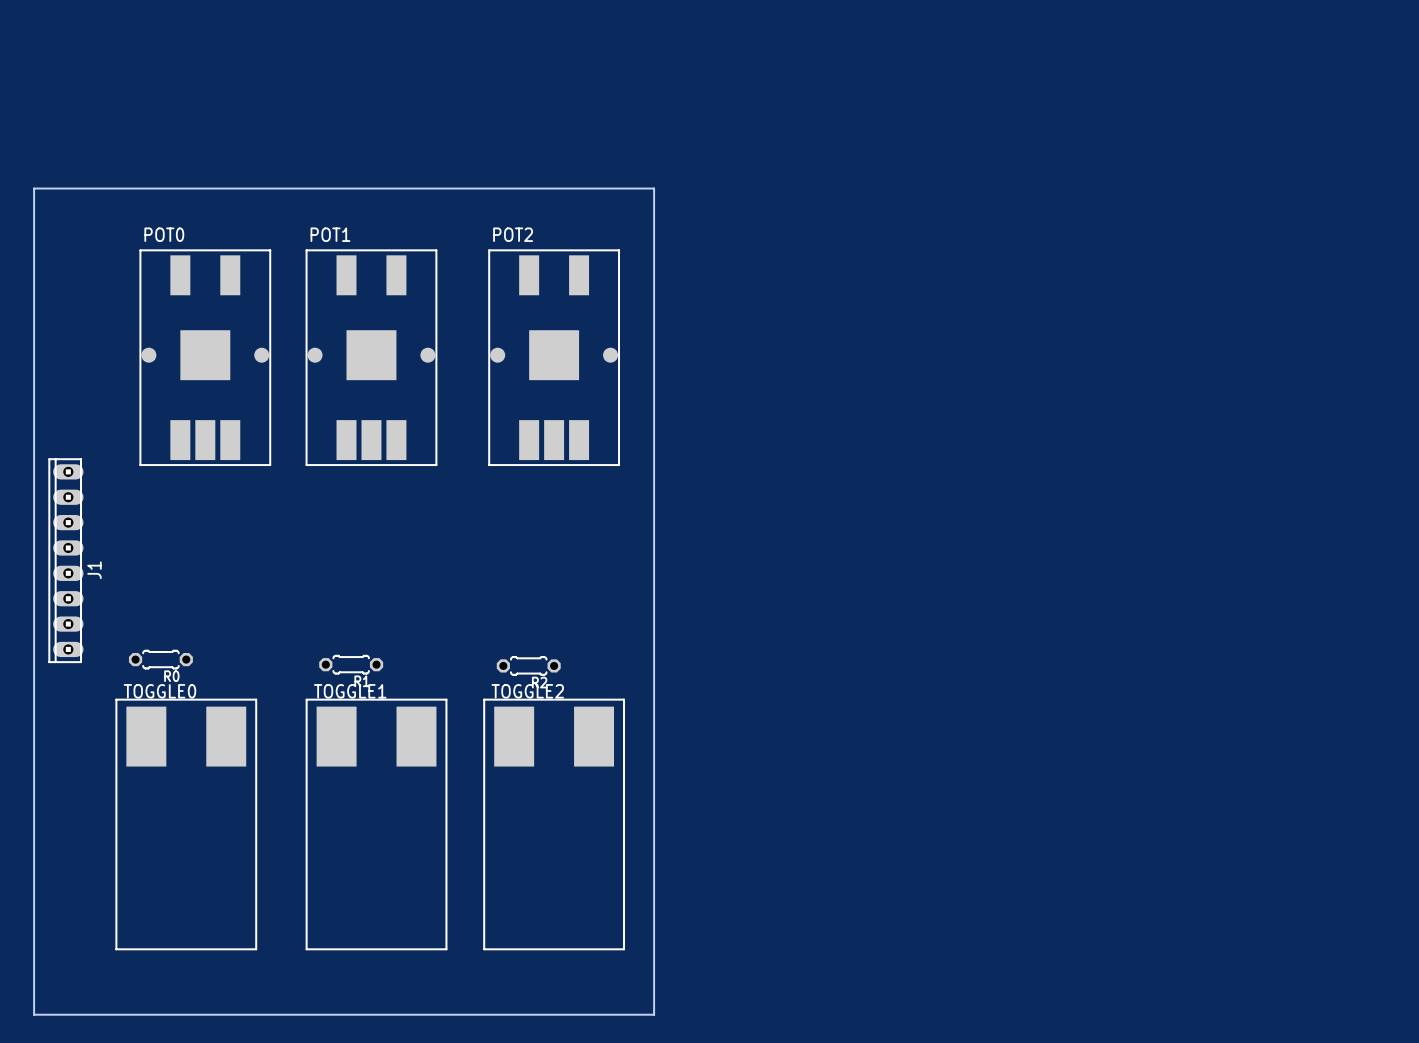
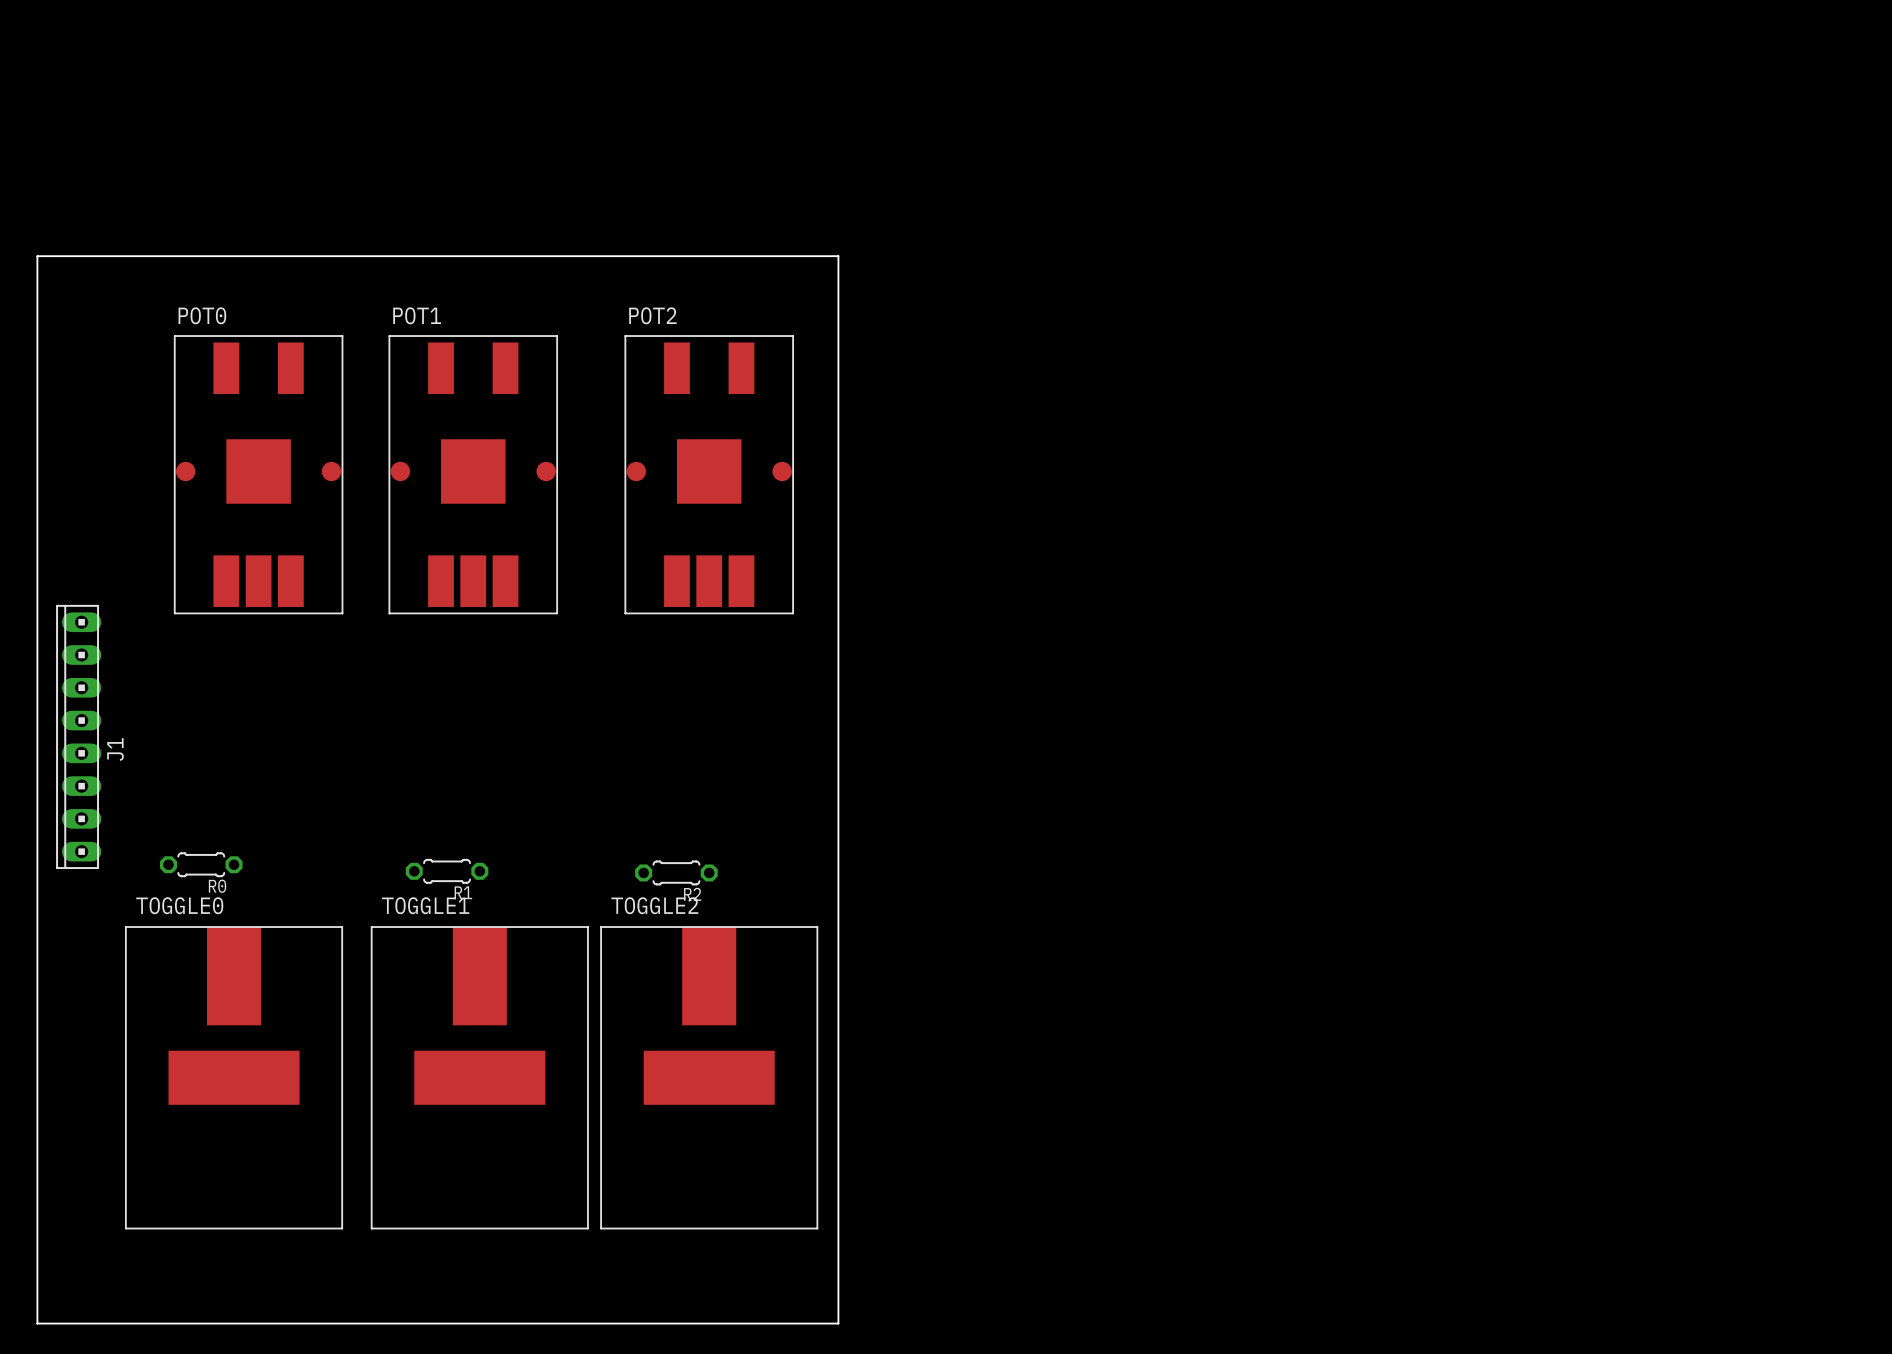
TOGGLE0 footprint: [115, 699, 257, 950] -> [125, 926, 343, 1230]
TOGGLE1 footprint: [306, 699, 448, 950] -> [370, 926, 589, 1230]
TOGGLE2 footprint: [483, 699, 625, 950] -> [600, 926, 819, 1230]

